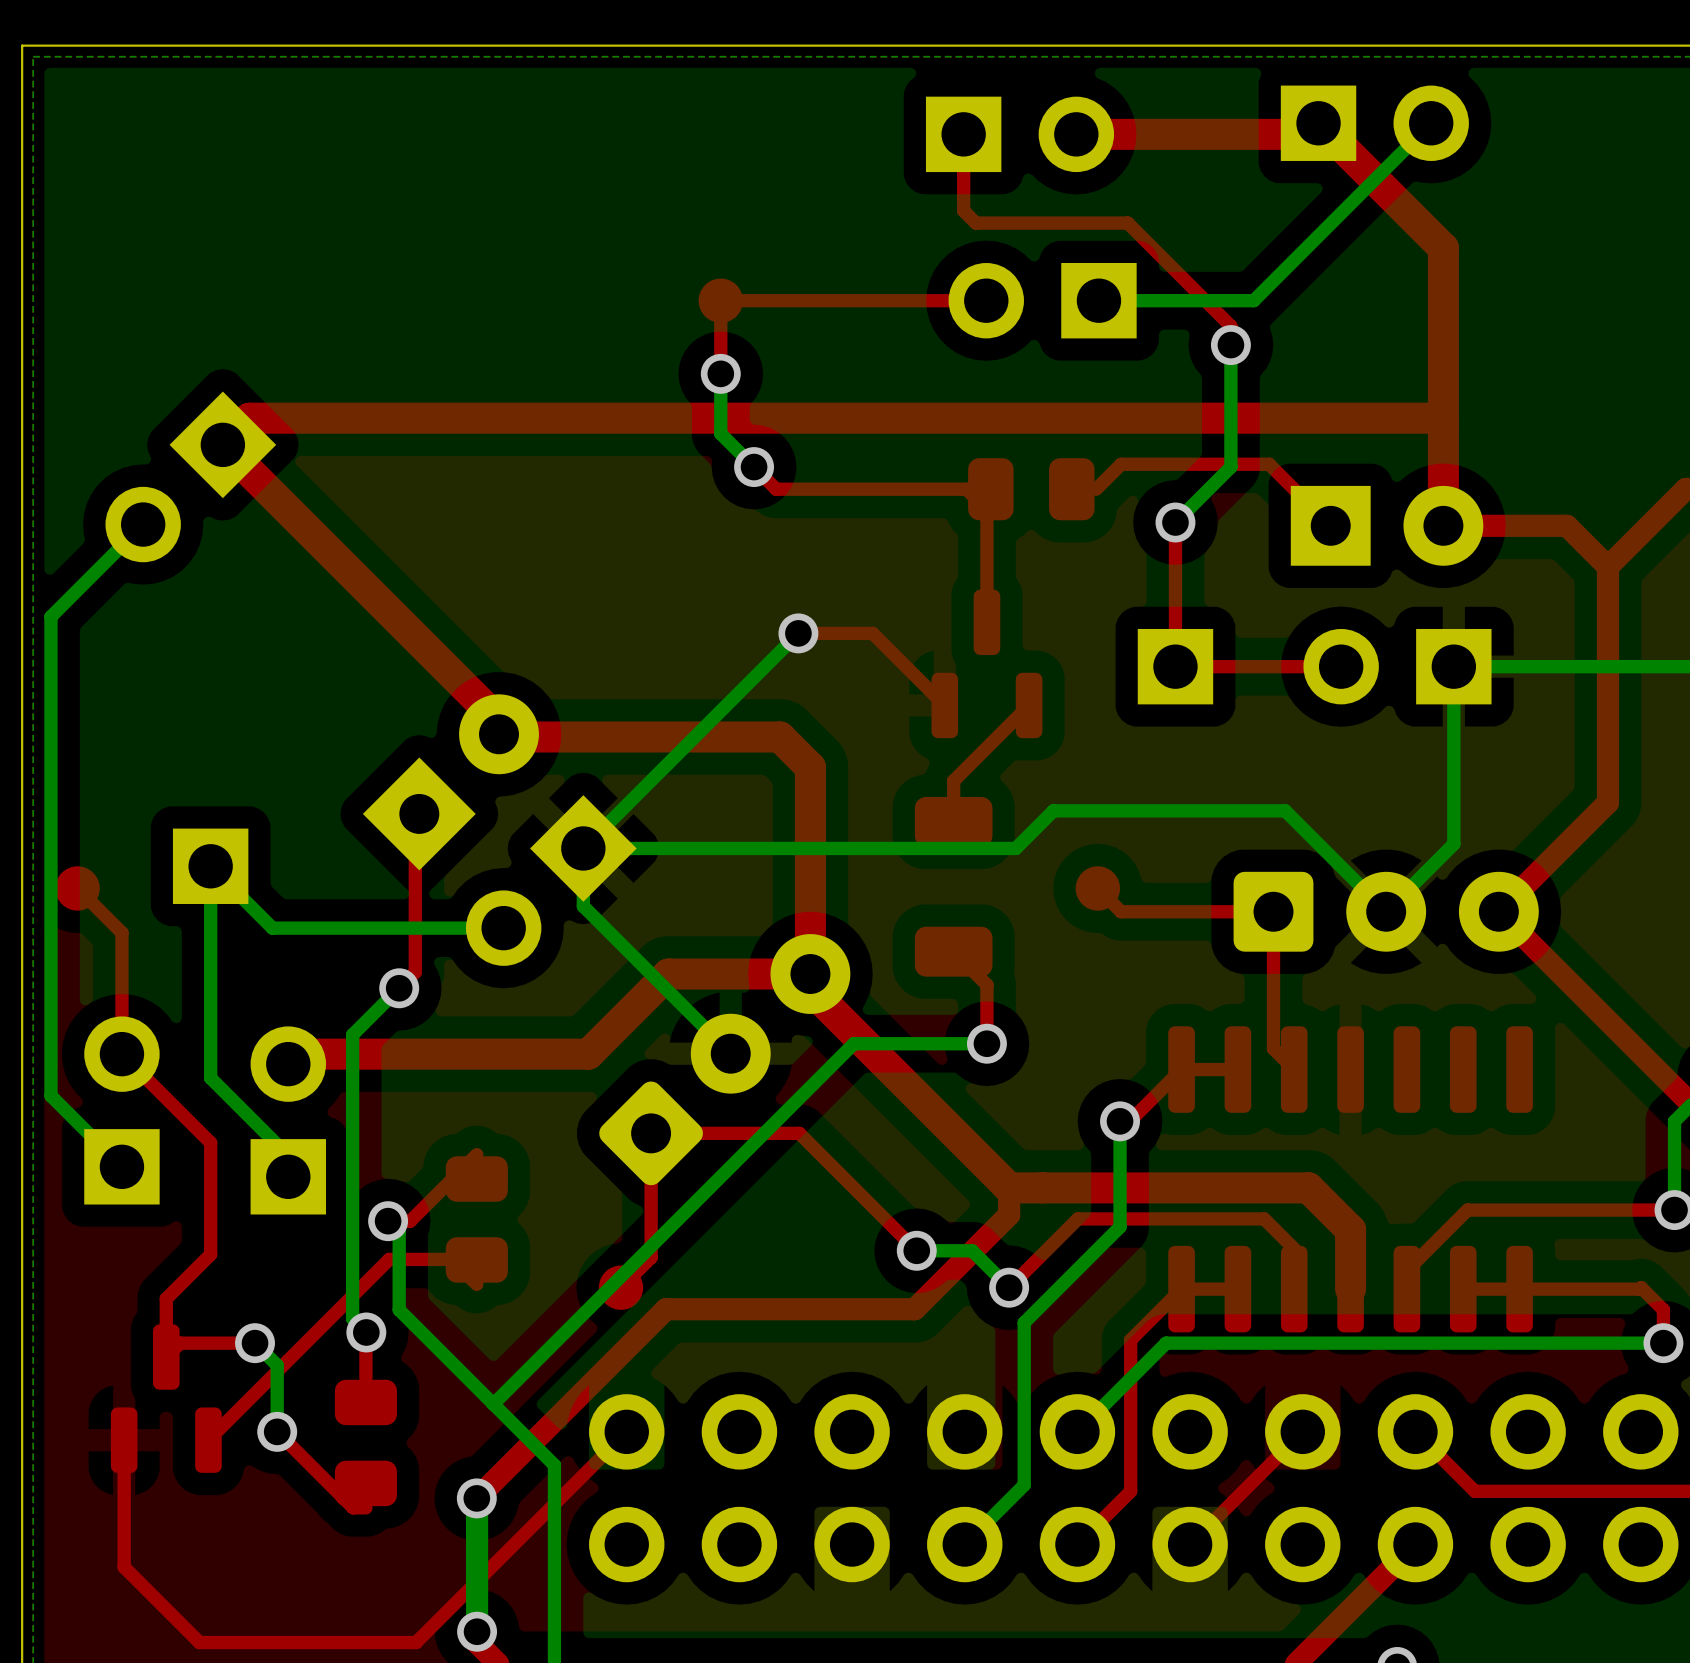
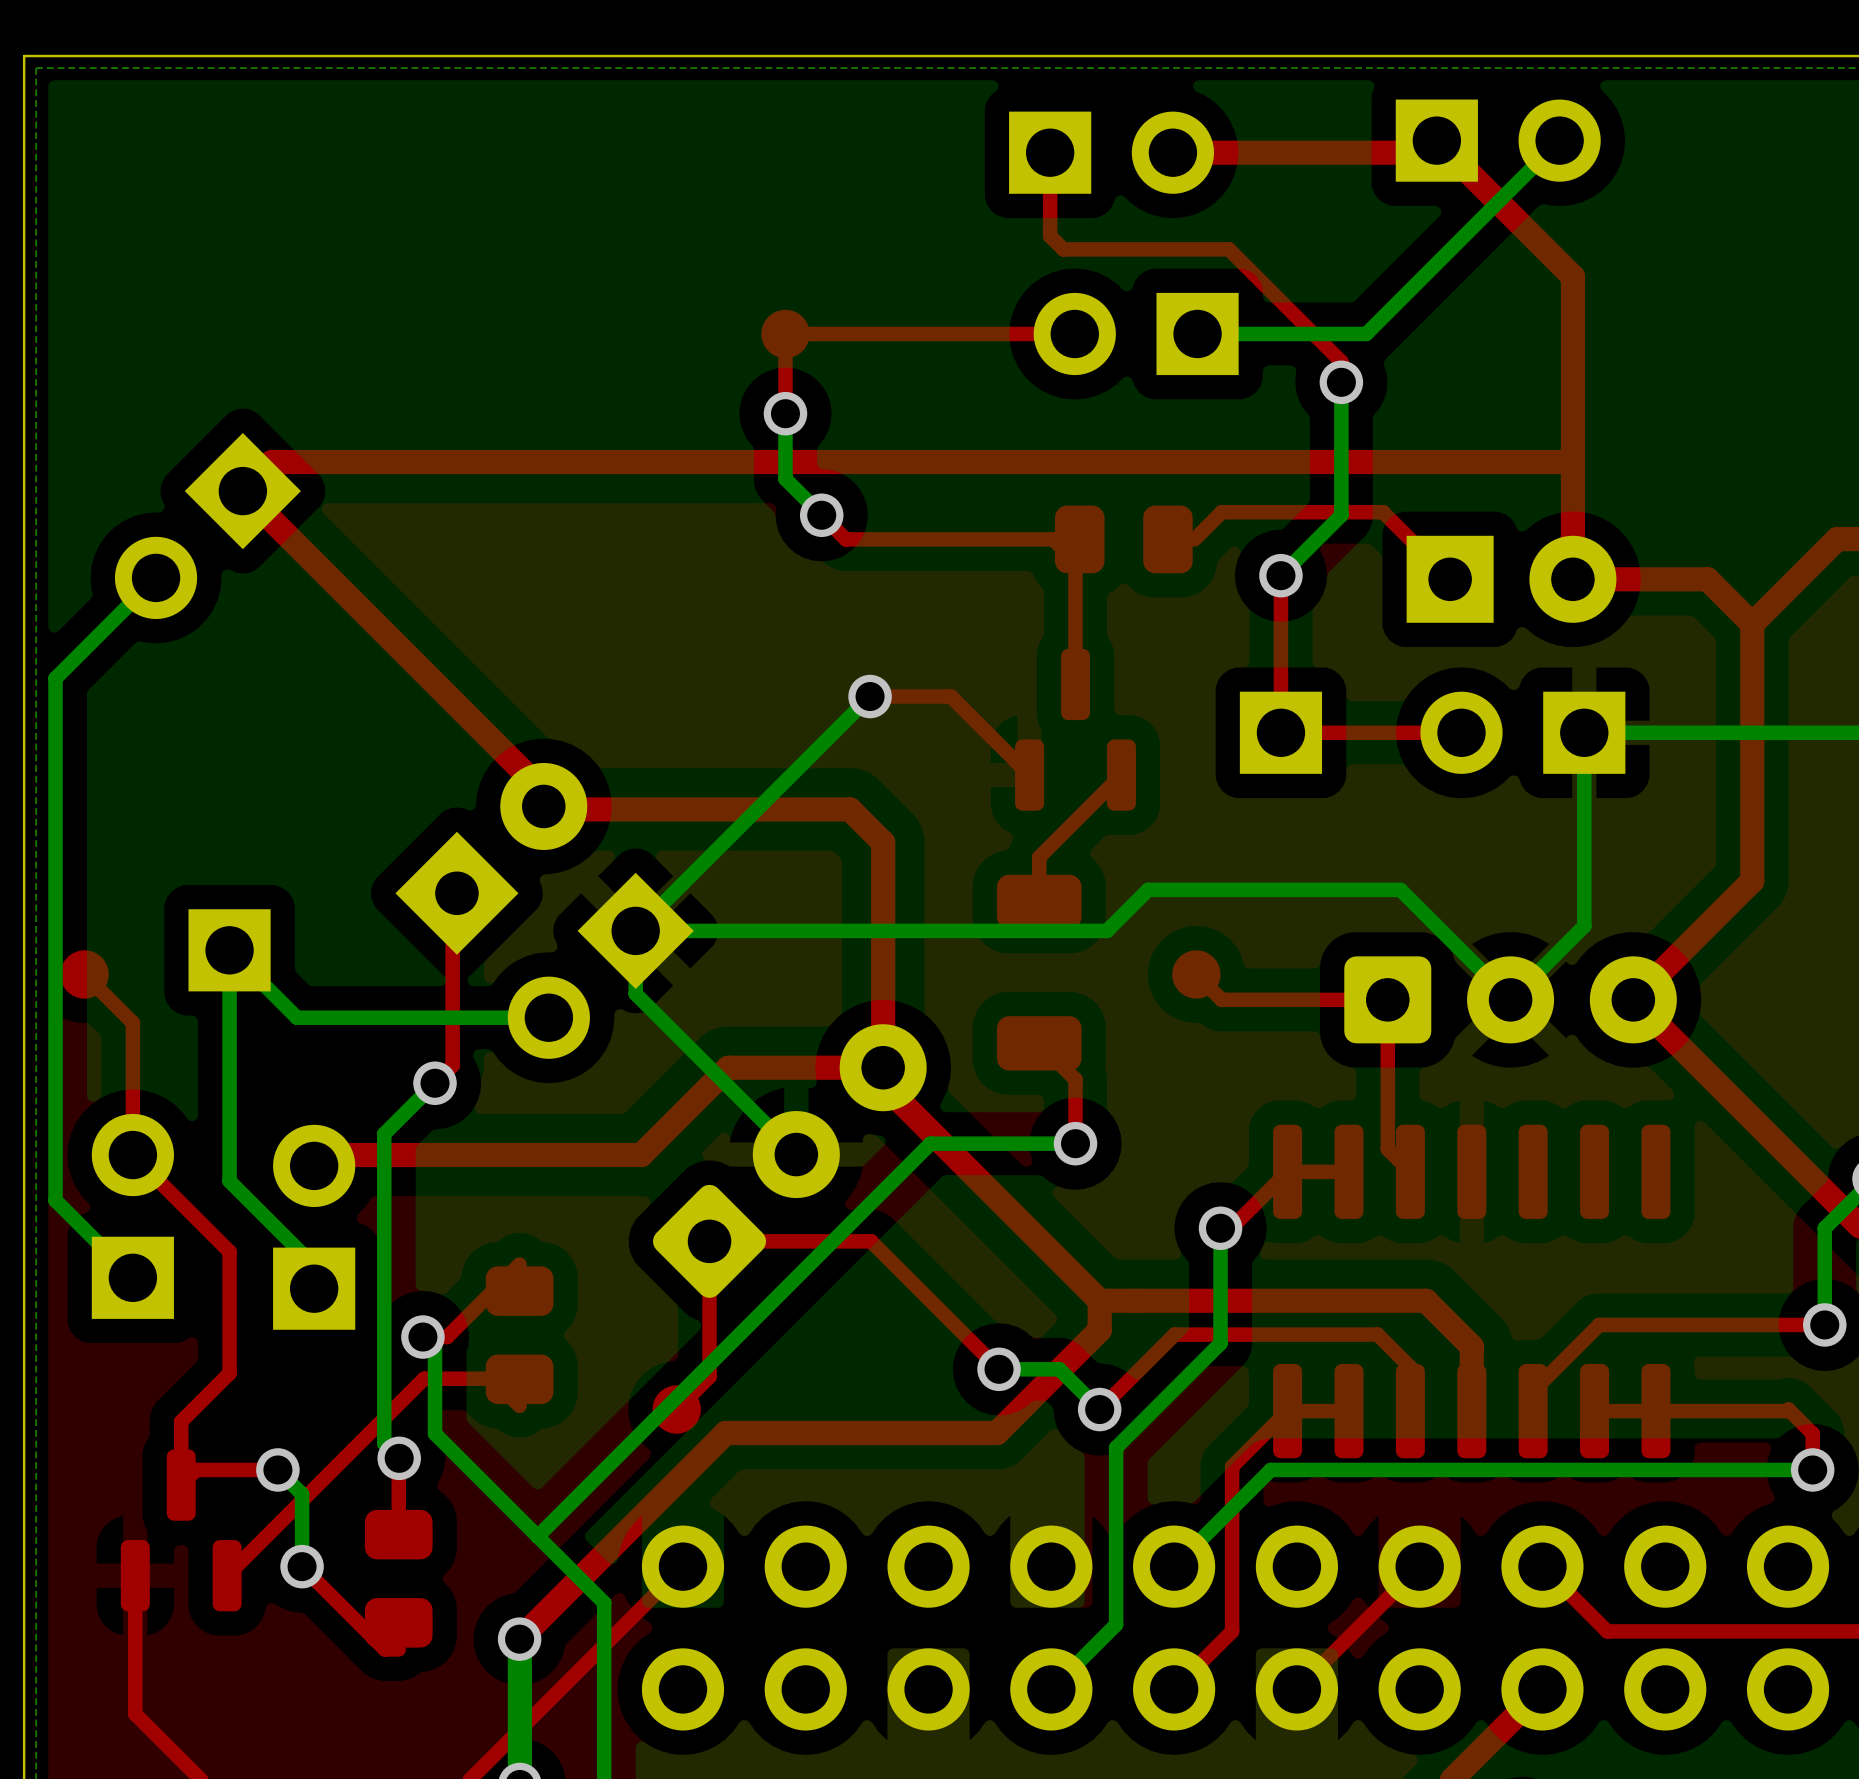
top track width: thick (1076, 134) (1307, 134) (1318, 123) (1443, 248) (1443, 525) -> thin (1172, 152) (1424, 152) (1436, 140) (1572, 276) (1572, 579)
top track width: thick (1443, 422) (1438, 418) (249, 418) (222, 444) (494, 717) (494, 736) (780, 736) (810, 767) (810, 989) (1009, 1187) (1308, 1187) (1350, 1229) (1350, 1289) -> thin (1572, 466) (1568, 462) (271, 462) (242, 491) (539, 787) (539, 809) (850, 809) (883, 842) (883, 1084) (1099, 1300) (1425, 1300) (1471, 1346) (1471, 1411)
top track width: thick (810, 974) (668, 974) (588, 1054) (299, 1054) -> thin (883, 1067) (728, 1067) (641, 1155) (326, 1155)

